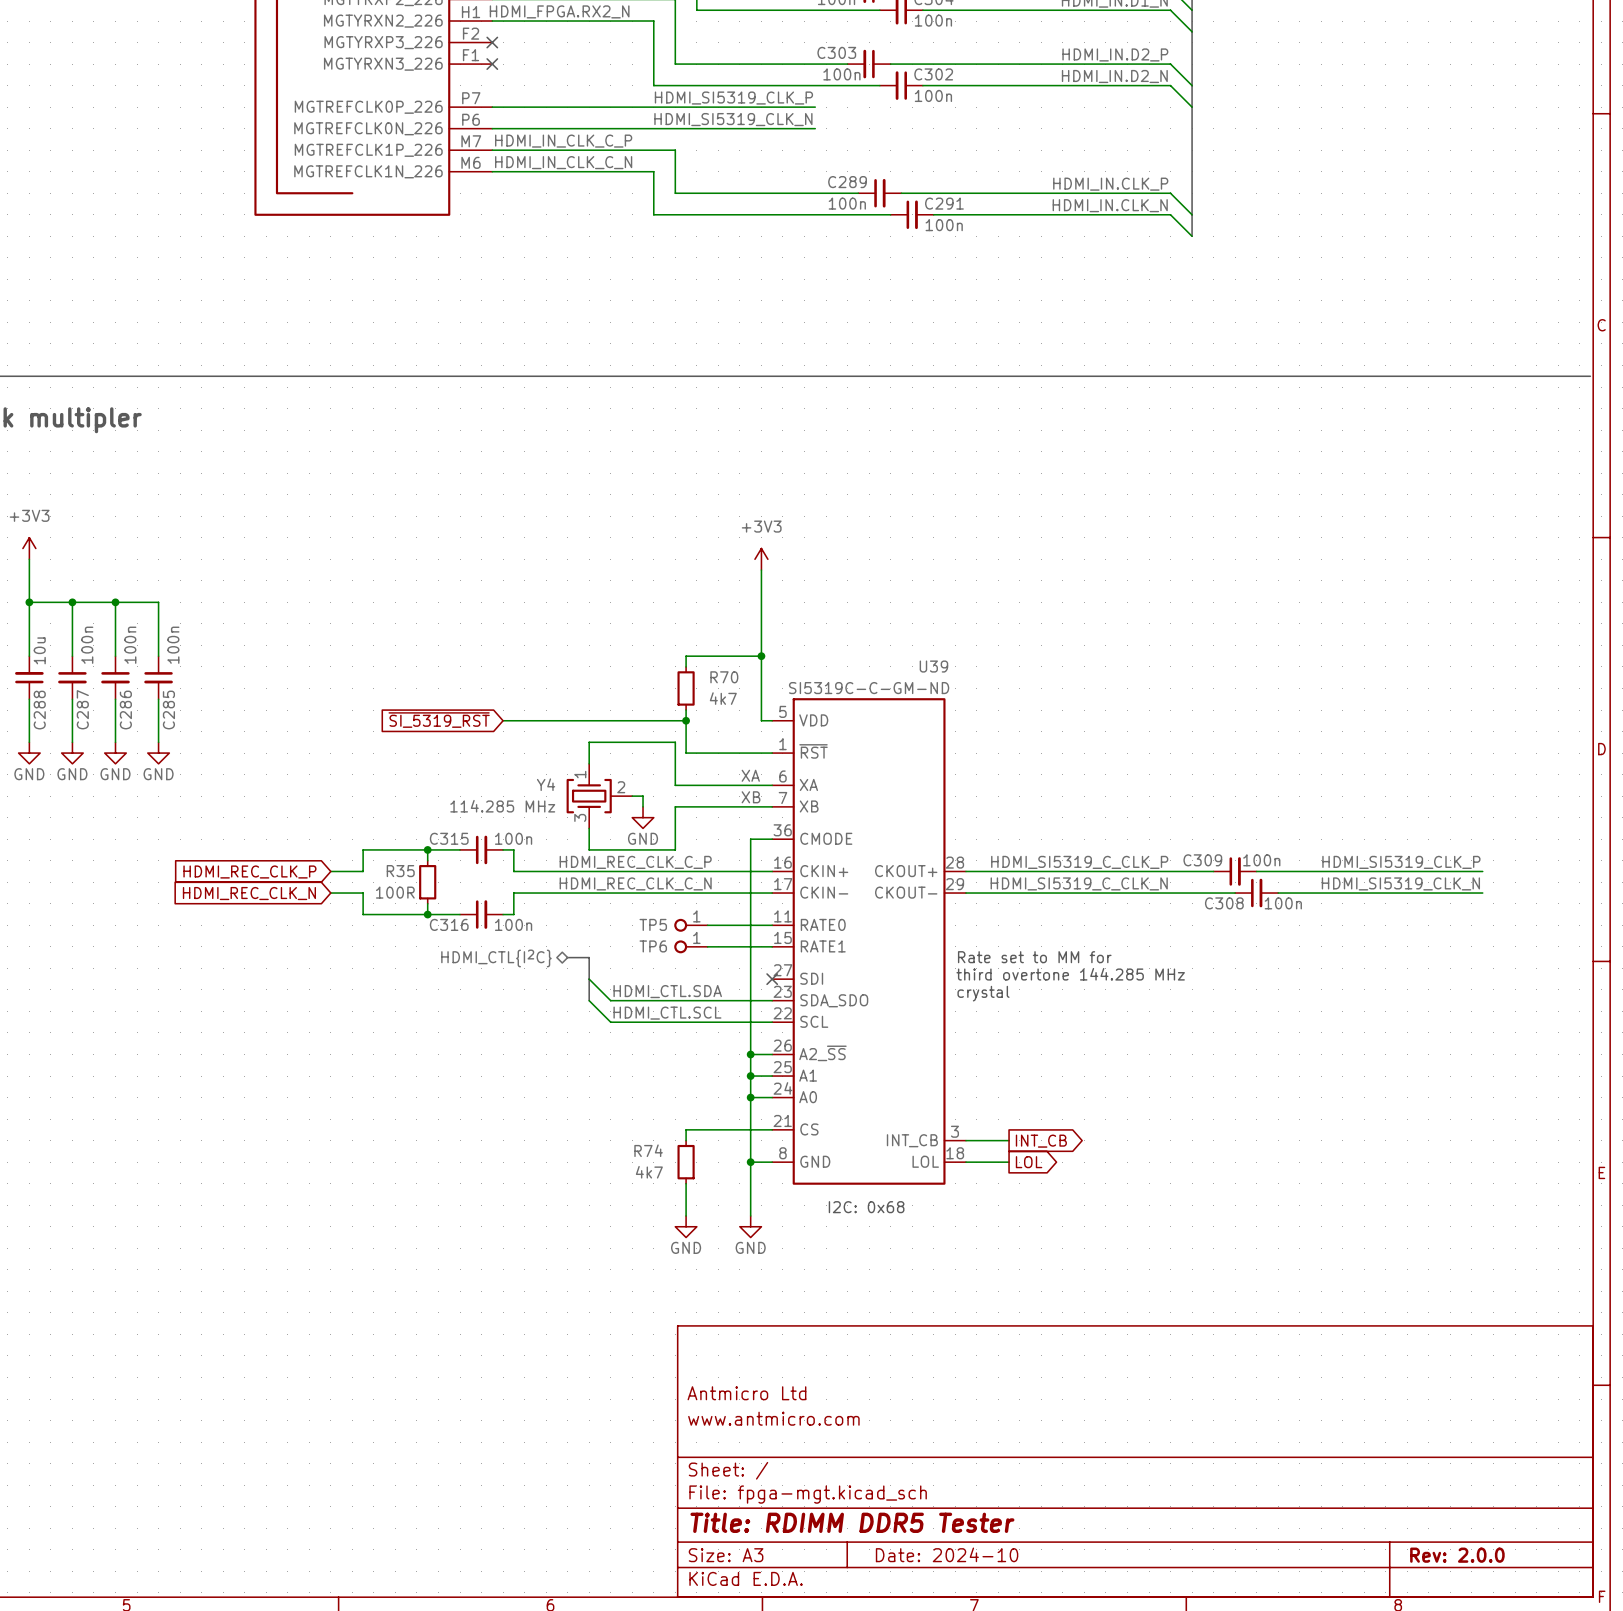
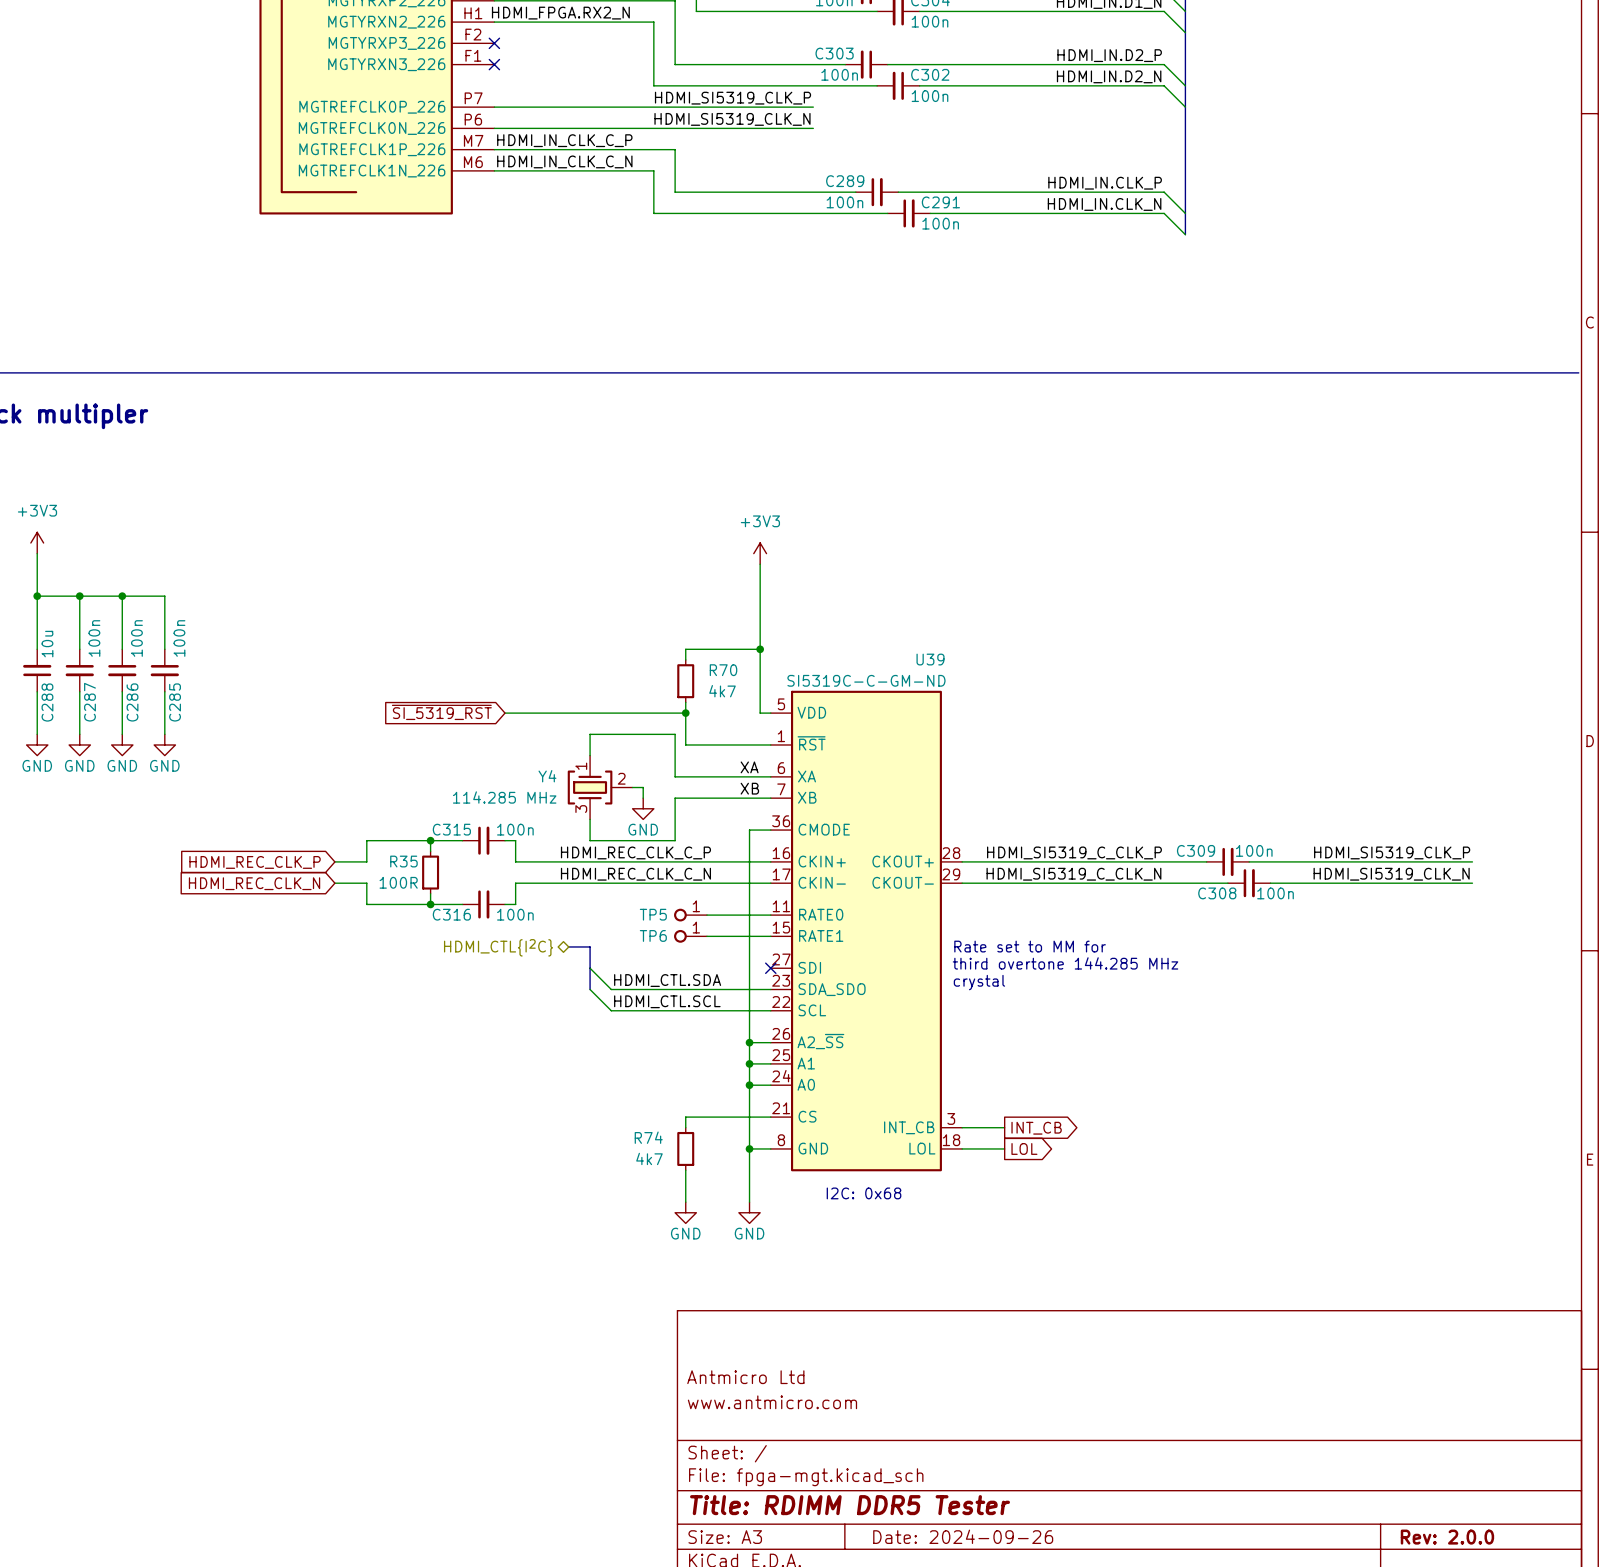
title block: Date: 2024-10 (947, 1554) -> Date: 2024-09-26 (963, 1536)

